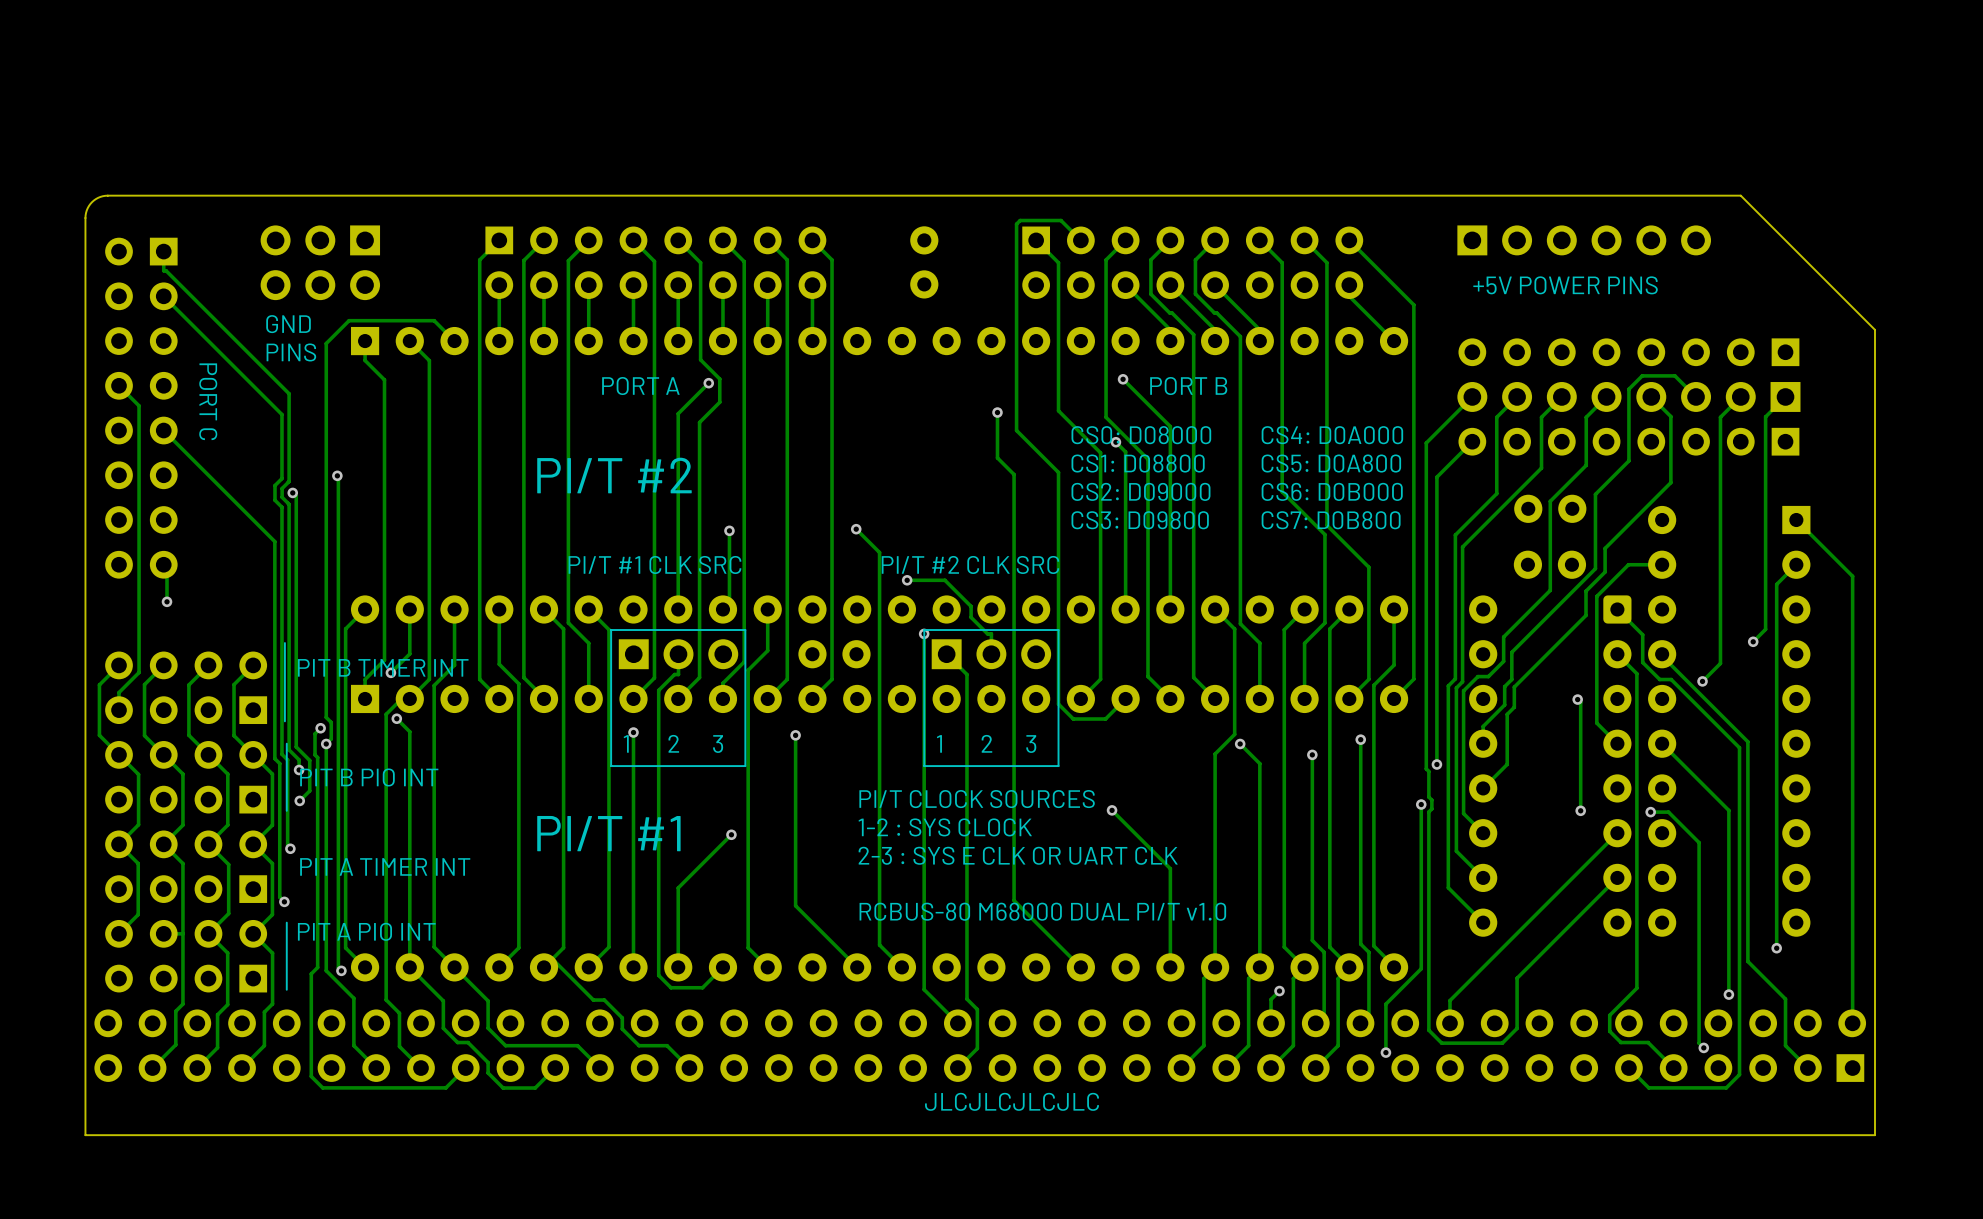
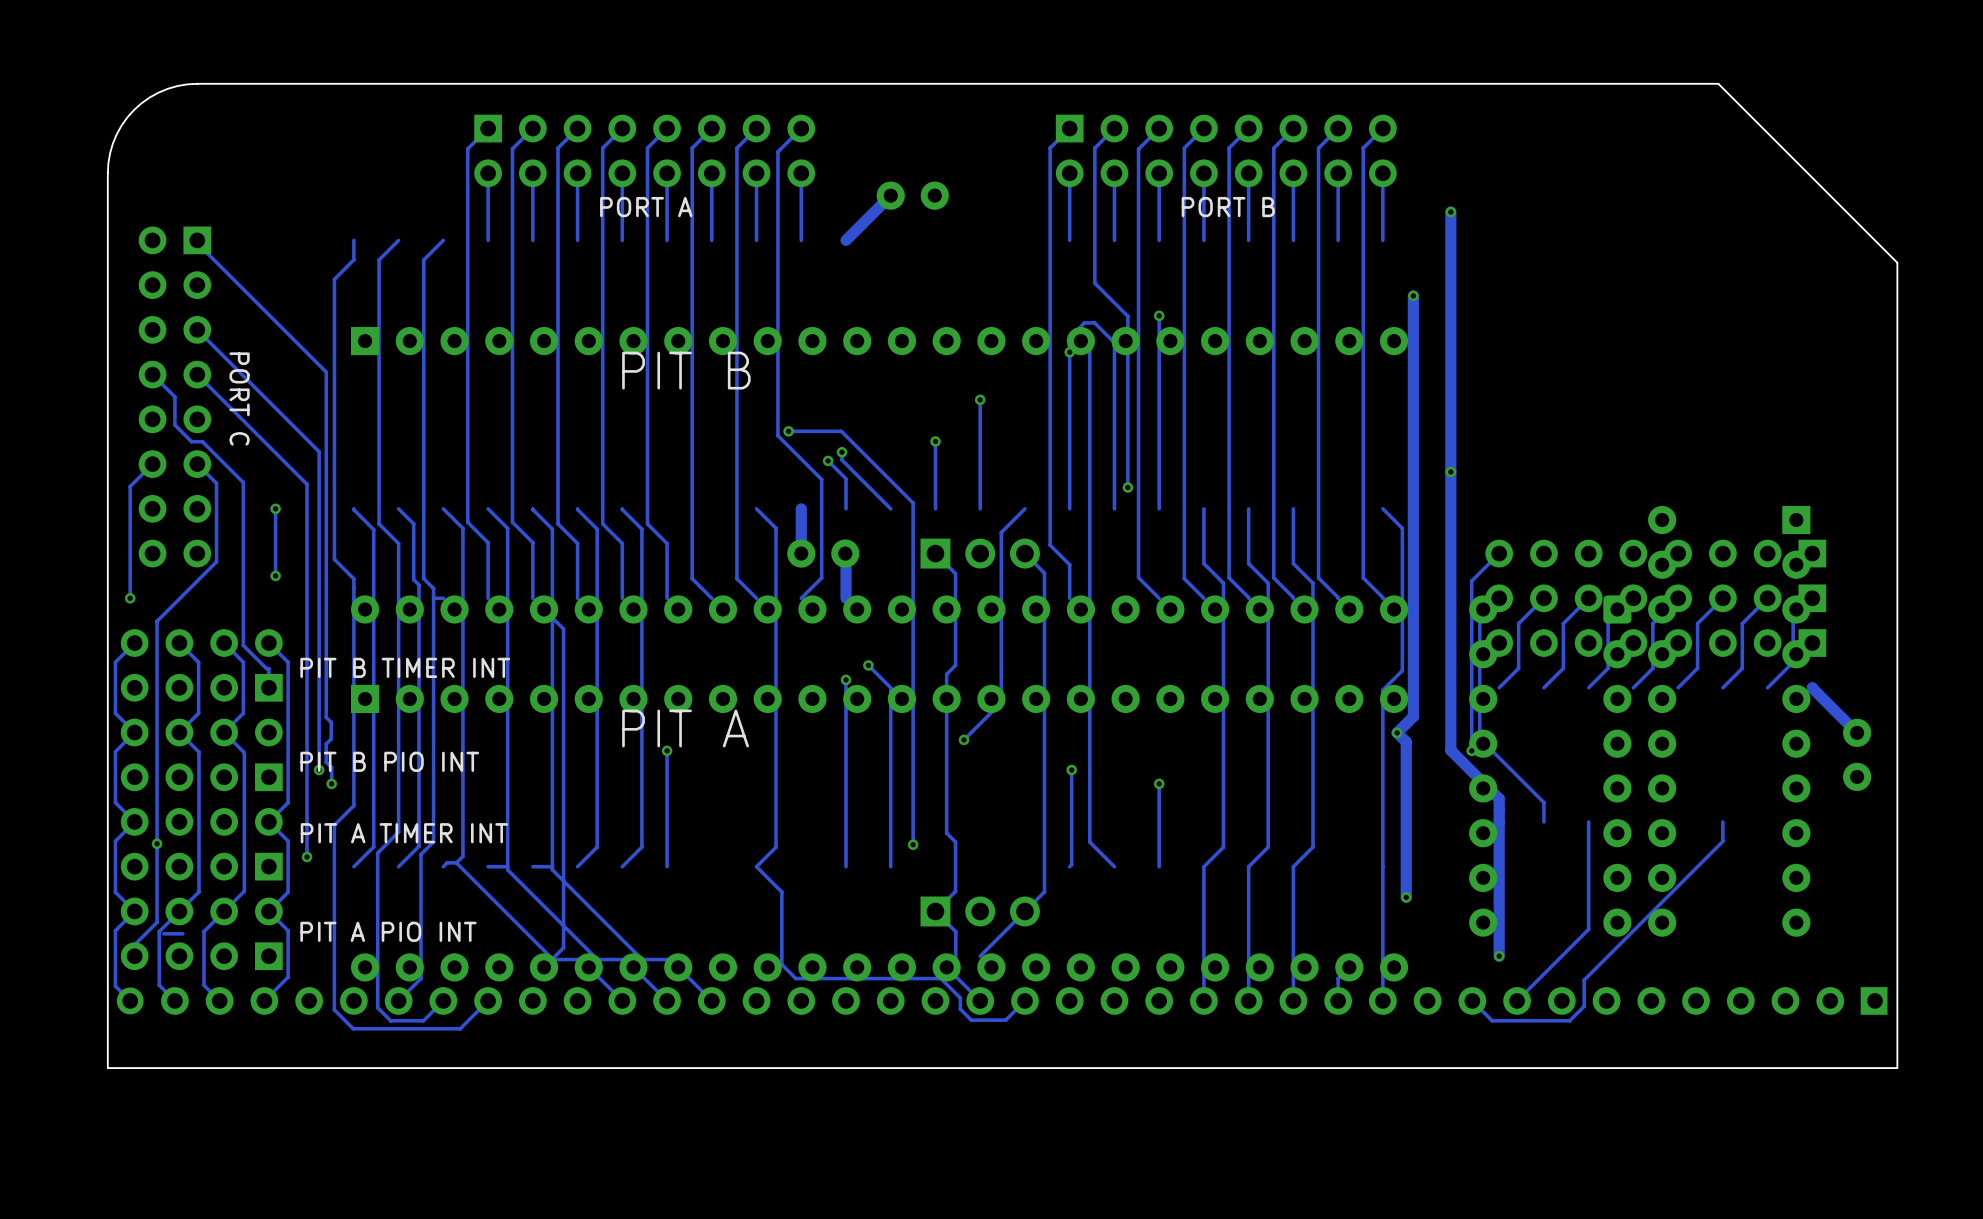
track: none -> (488, 128) (467, 148) (467, 522) (488, 542) (488, 598)
track: none -> (532, 128) (512, 148) (512, 522) (532, 542) (532, 598)
track: none -> (577, 128) (558, 148) (558, 523) (577, 543) (577, 598)
track: none -> (622, 128) (602, 148) (602, 523) (622, 543) (622, 598)
track: none -> (667, 128) (647, 148) (647, 523) (667, 543) (667, 598)
track: none -> (711, 128) (692, 148) (692, 578) (711, 598)
track: none -> (756, 128) (736, 148) (736, 578) (756, 598)
track: none -> (801, 128) (777, 151) (777, 435) (821, 479) (821, 577) (801, 598)
track: none -> (1069, 128) (1050, 148) (1050, 545) (1069, 564) (1069, 598)
track: none -> (1114, 128) (1094, 148) (1094, 283) (1127, 316) (1127, 487)
track: none -> (1159, 128) (1138, 149) (1138, 577) (1159, 598)
track: none -> (1203, 128) (1184, 148) (1184, 578) (1203, 598)
track: none -> (1248, 128) (1229, 148) (1229, 577) (1248, 598)
track: none -> (1293, 128) (1273, 148) (1273, 577) (1293, 598)
track: none -> (1338, 128) (1318, 148) (1318, 577) (1338, 598)
track: none -> (1382, 128) (1363, 148) (1363, 577) (1382, 598)
track: none -> (488, 173) (488, 240)
track: none -> (532, 173) (532, 240)
track: none -> (577, 173) (577, 240)
track: none -> (622, 173) (622, 240)
track: none -> (667, 173) (667, 240)
track: none -> (711, 173) (711, 240)
track: none -> (756, 173) (756, 240)
track: none -> (801, 173) (801, 240)
track: none -> (1069, 173) (1069, 240)
track: none -> (1114, 173) (1114, 240)
track: none -> (1159, 173) (1159, 240)
track: none -> (1203, 173) (1203, 240)
track: none -> (1248, 173) (1248, 240)
track: none -> (1293, 173) (1293, 240)
track: none -> (1338, 173) (1338, 240)
track: none -> (1382, 173) (1382, 240)
track: none -> (890, 195) (846, 240)
track: none -> (1450, 212) (1450, 750) (1499, 798) (1499, 956)
via: none -> (1450, 212)
track: none -> (353, 240) (353, 259) (334, 279) (334, 559) (353, 578) (353, 805) (334, 825) (334, 1009) (353, 1028) (460, 1028) (488, 1000)
track: none -> (398, 240) (379, 259) (379, 523) (398, 543) (398, 832) (377, 853) (377, 1007) (390, 1020) (423, 1020) (443, 1000)
track: none -> (443, 240) (423, 259) (423, 578) (433, 588) (433, 841) (420, 854) (420, 978) (398, 1000)
track: (499, 240) (479, 259) (479, 679) (499, 698) -> none
track: (544, 240) (523, 260) (523, 677) (544, 697) -> none
track: (588, 240) (568, 260) (568, 622) (588, 643) (588, 698) -> none
track: (633, 240) (654, 261) (654, 677) (633, 698) -> none
track: (678, 240) (700, 262) (700, 359) (719, 379) (719, 402) (699, 422) (699, 677) (678, 698) -> none
track: (722, 240) (744, 261) (744, 661) (722, 683) (722, 698) -> none
track: (767, 240) (787, 259) (787, 679) (767, 698) -> none
track: (812, 240) (832, 259) (832, 679) (812, 698) -> none
track: (1036, 240) (1058, 262) (1058, 410) (1100, 452) (1100, 679) (1080, 698) -> none
track: (1080, 240) (1061, 220) (1020, 220) (1016, 224) (1016, 430) (1058, 472) (1058, 704) (1073, 719) (1105, 719) (1125, 698) -> none
track: (1125, 240) (1106, 259) (1106, 417) (1147, 459) (1147, 676) (1170, 698) -> none
track: (1170, 240) (1150, 259) (1150, 294) (1193, 334) (1193, 677) (1215, 698) -> none
track: (1215, 240) (1195, 260) (1195, 293) (1240, 336) (1240, 623) (1259, 643) (1259, 698) -> none
track: (1259, 240) (1282, 262) (1282, 491) (1324, 534) (1324, 622) (1304, 643) (1304, 698) -> none
track: (1304, 240) (1326, 262) (1326, 525) (1368, 567) (1368, 679) (1349, 698) -> none
track: (1349, 240) (1413, 304) (1413, 679) (1394, 698) -> none
part: (1584, 240) -> none
track: (163, 251) (163, 270) (166, 270) (289, 393) (289, 481) (282, 488) (282, 497) (289, 504) (289, 749) (299, 759) (299, 769) -> none
part: (320, 262) -> none
part position: (655, 262) -> (644, 150)
part rotation: 0° (924, 262) -> 90° clockwise (912, 195)
part position: (924, 262) -> (912, 195)
part position: (1192, 262) -> (1226, 150)
track: (499, 285) (499, 341) -> none
track: (544, 285) (544, 341) -> none
track: (588, 285) (588, 341) -> none
track: (633, 285) (633, 341) -> none
track: (678, 285) (678, 341) -> none
track: (722, 285) (722, 341) -> none
track: (767, 285) (767, 341) -> none
track: (812, 285) (812, 341) -> none
track: (1125, 285) (1170, 329) -> none
track: (1170, 285) (1215, 329) -> none
track: (1215, 285) (1259, 329) -> none
text: +5V POWER PINS (1565, 285) -> none
track: none -> (1413, 295) (1413, 716) (1397, 732) (1406, 741) (1406, 897)
via: none -> (1413, 295)
track: (163, 296) (197, 329) -> none
track: (1349, 296) (1394, 341) -> none
track: none -> (1159, 315) (1159, 508)
via: none -> (1159, 315)
text: GND (288, 324) -> none
track: none -> (1073, 333) (1084, 322) (1094, 322) (1114, 342) (1114, 508)
track: none -> (1089, 333) (1089, 842) (1114, 866)
track: (365, 341) (365, 360) (384, 379) (384, 660) (365, 679) (365, 698) -> none
track: (409, 341) (429, 360) (429, 679) (409, 698) -> none
track: (454, 341) (434, 320) (349, 320) (326, 343) (326, 717) -> (197, 240) (197, 243) (326, 372) (326, 717)
text: PINS (291, 352) -> none
track: none -> (1069, 352) (1069, 508)
via: none -> (1069, 352)
part: (1628, 352) -> none
text: none -> PIT B (686, 370)
track: none -> (152, 374) (174, 396) (174, 425) (191, 441) (202, 441) (243, 482) (243, 645) (266, 668) (268, 668) (268, 687)
track: none -> (197, 374) (307, 484) (307, 856)
track: (1123, 379) (1170, 426) (1170, 609) -> none
via: (1123, 379) -> none
track: (708, 383) (678, 413) (678, 609) -> none
via: (708, 383) -> none
track: (119, 385) (139, 405) (139, 672) (119, 692) (119, 710) -> none
text position: PORT A (640, 386) -> PORT A (646, 207)
text position: PORT B (1188, 386) -> PORT B (1228, 207)
track: (1472, 396) (1426, 443) (1426, 768) (1428, 771) (1428, 797) (1431, 800) (1431, 808) (1428, 811) (1428, 1030) (1441, 1043) (1502, 1043) (1517, 1028) (1517, 978) (1617, 877) -> none
track: (1517, 396) (1496, 417) (1496, 493) (1455, 535) (1455, 678) (1448, 685) (1448, 887) (1483, 922) -> none
track: (1561, 396) (1541, 417) (1541, 468) (1462, 547) (1462, 681) (1456, 688) (1456, 851) (1483, 877) -> none
track: (1606, 396) (1586, 417) (1586, 465) (1550, 501) (1550, 590) (1503, 637) (1503, 661) (1488, 676) (1477, 676) (1463, 690) (1463, 813) (1483, 833) -> none
part: (1628, 396) -> none
track: (1651, 396) (1670, 416) (1670, 482) (1605, 548) (1605, 572) (1586, 591) (1586, 615) (1514, 687) (1514, 707) (1507, 714) (1507, 764) (1483, 788) -> none
track: (1696, 396) (1674, 375) (1642, 375) (1628, 389) (1628, 460) (1595, 494) (1595, 568) (1511, 652) (1511, 679) (1504, 686) (1504, 704) (1483, 726) (1483, 743) -> none
track: (1740, 396) (1720, 417) (1720, 663) (1702, 681) -> none
track: (1785, 396) (1765, 416) (1765, 629) (1753, 641) -> none
track: none -> (980, 399) (980, 508)
text position: PORT C (208, 401) -> PORT C (239, 398)
part position: (141, 408) -> (174, 396)
track: (997, 412) (997, 457) (1014, 474) (1014, 900) (1080, 967) -> none
via position: (997, 412) -> (980, 399)
track: (281, 414) (281, 478) (274, 485) (274, 500) (281, 507) (281, 754) (287, 760) (287, 846) (290, 848) -> (281, 414) (319, 451) (319, 770)
track: (163, 430) (197, 464) -> none
track: none -> (788, 431) (841, 431) (913, 503) (913, 844)
via: none -> (788, 431)
text: CS0: D08000 (1141, 435) -> none
text: CS4: D0A000 (1332, 435) -> none
track: none -> (935, 441) (935, 508)
via: none -> (935, 441)
track: (1472, 441) (1436, 477) (1436, 764) -> none
part: (1628, 441) -> none
track: (1115, 442) (1125, 451) (1125, 609) -> none
via position: (1115, 442) -> (1127, 487)
track: none -> (841, 452) (841, 460) (890, 508)
via: none -> (841, 452)
track: none -> (828, 460) (846, 478) (846, 508)
via: none -> (828, 460)
text: CS1: D08800 (1138, 463) -> none
text: CS5: D0A800 (1331, 463) -> none
track: none -> (152, 464) (130, 486) (130, 598)
via: none -> (1450, 471)
via: (337, 475) -> none
track: (338, 475) (338, 967) (341, 970) -> none
text: PI/T #2 (614, 475) -> none
track: (216, 483) (274, 541) (274, 758) (279, 763) (279, 897) (284, 901) -> (216, 483) (216, 561) (157, 621) (157, 922) (134, 944) (134, 956)
text: CS2: D09000 (1140, 491) -> none
text: CS6: D0B000 (1332, 491) -> none
track: (292, 492) (296, 496) (296, 746) (309, 760) (309, 790) (299, 800) -> none
via position: (292, 492) -> (275, 508)
track: none -> (275, 508) (275, 575)
track: none -> (353, 508) (373, 529) (373, 846) (353, 866)
track: none -> (398, 508) (413, 523) (413, 579) (418, 584) (418, 846) (398, 866)
track: none -> (443, 508) (462, 528) (462, 856) (456, 862)
track: none -> (488, 508) (507, 528) (507, 869) (597, 959) (625, 959) (667, 1000)
track: none -> (532, 508) (552, 529) (552, 869) (642, 959) (670, 959) (711, 1000)
track: none -> (577, 508) (597, 529) (597, 847) (577, 866)
track: none -> (622, 508) (641, 529) (641, 847) (622, 866)
track: none -> (756, 508) (776, 528) (776, 847) (756, 866) (781, 892) (781, 964) (795, 978) (940, 978) (960, 998) (960, 1009) (971, 1020) (1005, 1020) (1024, 1000)
track: none -> (801, 508) (801, 553)
track: none -> (1024, 508) (1001, 532) (1001, 702) (963, 739)
track: none -> (1382, 508) (1402, 528) (1402, 670) (1382, 690) (1382, 1000)
part: (1550, 508) -> none
text: CS3: D09800 (1140, 520) -> none
text: CS7: D0B800 (1331, 520) -> none
track: (1796, 520) (1852, 576) (1852, 1023) -> none
track: (856, 529) (879, 552) (879, 945) (901, 967) -> none
via: (856, 529) -> none
track: (729, 530) (729, 603) -> none
via: (729, 530) -> none
track: none -> (845, 553) (846, 598)
track: none -> (935, 553) (955, 573) (955, 665) (946, 674) (946, 833) (955, 842) (955, 891) (935, 911) (955, 931) (955, 976) (980, 1000)
track: none -> (1024, 553) (1044, 573) (1044, 891) (980, 956)
track: none -> (1499, 553) (1471, 581) (1471, 750)
part: none -> (1655, 553)
text: PI/T #1 CLK SRC (654, 564) -> none
text: PI/T #2 CLK SRC (970, 564) -> none
part: (1549, 564) -> none
track: (1662, 564) (1628, 564) (1596, 596) (1596, 723) (1617, 743) -> none
track: (1796, 564) (1776, 584) (1776, 948) -> none
track: (167, 568) (167, 601) -> none
via: none -> (275, 575)
part: none -> (1002, 575)
track: (907, 580) (944, 580) (971, 606) (971, 617) (987, 633) (991, 633) (991, 654) -> none
via: (907, 580) -> none
track: none -> (443, 598) (433, 598)
track: none -> (1499, 598) (1479, 617) (1479, 738) (1543, 802) (1543, 821)
track: none -> (1543, 598) (1518, 623) (1518, 668) (1499, 687)
track: none -> (1588, 598) (1563, 623) (1563, 668) (1543, 687)
track: none -> (1633, 598) (1608, 623) (1608, 668) (1588, 687)
part: none -> (1655, 598)
track: none -> (1678, 598) (1652, 623) (1652, 668) (1633, 687)
track: none -> (1722, 598) (1697, 623) (1697, 668) (1678, 687)
track: none -> (1767, 598) (1742, 623) (1742, 668) (1722, 687)
track: none -> (1812, 598) (1793, 617) (1793, 662) (1767, 687)
via position: (167, 601) -> (130, 598)
track: (365, 609) (345, 628) (345, 947) (365, 967) -> none
track: (409, 609) (409, 653) (390, 672) -> none
track: (454, 609) (454, 665) (434, 685) (434, 947) (488, 1000) (488, 1028) (505, 1045) (577, 1045) (599, 1068) -> none
track: (499, 609) (499, 664) (518, 683) (518, 947) (499, 967) -> none
track: (588, 609) (608, 629) (608, 947) (588, 967) -> none
track: (767, 609) (767, 650) (748, 670) (748, 947) (767, 967) -> none
track: (1215, 609) (1234, 629) (1234, 734) (1215, 754) (1215, 967) (1203, 978) -> (1203, 508) (1203, 563) (1223, 583) (1223, 847) (1203, 866) (1203, 978)
track: (1304, 609) (1284, 629) (1284, 947) (1304, 967) (1293, 978) -> (1293, 508) (1293, 563) (1312, 583) (1312, 847) (1293, 866) (1293, 978)
track: (1349, 609) (1329, 628) (1329, 947) (1349, 966) -> none
track: (1394, 609) (1394, 665) (1373, 685) (1373, 946) (1394, 966) -> none
track: (1617, 609) (1642, 634) (1642, 662) (1659, 679) (1671, 679) (1739, 747) (1739, 1074) (1726, 1087) (1648, 1087) (1628, 1068) -> none
line: (745, 630) (611, 630) (611, 766) (745, 766) (745, 630) -> none
line: (1058, 630) (924, 630) (924, 766) (1058, 766) (1058, 630) -> none
track: (924, 633) (924, 989) (957, 1023) -> none
via: (924, 633) -> none
via: (1753, 641) -> none
track: none -> (134, 643) (115, 662) (115, 713) (134, 732) (115, 751) (115, 802) (134, 821) (115, 841) (115, 892) (134, 911) (115, 930) (115, 986) (130, 1000)
track: none -> (179, 643) (198, 662) (198, 713) (179, 732) (198, 752) (198, 891) (159, 931) (159, 985) (174, 1000)
track: none -> (224, 643) (243, 662) (243, 713) (224, 732) (244, 752) (244, 891) (204, 931) (204, 985) (219, 1000)
track: none -> (268, 643) (288, 662) (288, 802) (268, 821) (288, 841) (288, 892) (268, 911) (288, 930) (288, 977) (264, 1000)
line: (284, 643) (284, 721) -> none
part: none -> (1655, 643)
track: (678, 654) (678, 674) (674, 674) (658, 690) (658, 975) (671, 987) (702, 987) (722, 967) -> none
part: (678, 654) -> none
part position: (834, 654) -> (823, 553)
track: (946, 654) (966, 674) (966, 999) (977, 1009) (977, 1048) (957, 1068) -> none
part position: (991, 654) -> (980, 553)
track: (1617, 654) (1636, 673) (1636, 988) (1609, 1015) (1609, 1031) (1620, 1042) (1648, 1042) (1673, 1068) -> none
track: (1662, 656) (1747, 741) (1747, 961) (1785, 999) (1785, 1045) (1807, 1068) -> none
track: (119, 665) (99, 684) (99, 735) (138, 774) (138, 824) (119, 844) (138, 863) (138, 914) (119, 933) -> none
track: (163, 665) (144, 684) (144, 735) (182, 774) (182, 825) (163, 844) (182, 863) (182, 1004) (175, 1011) (175, 1044) (152, 1068) -> none
track: (208, 665) (188, 684) (188, 735) (227, 774) (227, 825) (208, 844) (228, 864) (228, 913) (208, 933) (227, 953) (227, 1004) (217, 1014) (217, 1047) (197, 1068) -> none
track: (253, 665) (234, 684) (234, 735) (272, 774) (272, 825) (253, 844) (272, 863) (272, 914) (253, 933) (272, 953) (272, 1003) (264, 1012) (264, 1045) (242, 1068) -> none
track: none -> (868, 665) (890, 687) (890, 866)
via: none -> (868, 665)
part: (980, 665) -> none
via: (390, 672) -> none
track: none -> (846, 679) (846, 866)
via: none -> (846, 679)
via: (1702, 681) -> none
part position: (186, 687) -> (201, 665)
track: none -> (1812, 688) (1857, 732)
track: (401, 698) (386, 714) (386, 999) (399, 1013) (399, 1046) (420, 1068) -> none
track: (1577, 699) (1580, 702) (1580, 810) -> none
via: (1577, 699) -> none
track: (396, 718) (409, 731) (409, 967) (443, 1000) (443, 1028) (457, 1042) (468, 1042) (488, 1062) (488, 1072) (503, 1088) (535, 1088) (555, 1068) -> none
via: (396, 718) -> none
track: (320, 728) (315, 733) (315, 754) (317, 757) (317, 967) (311, 973) (311, 1076) (322, 1087) (445, 1087) (465, 1068) -> none
via: (320, 728) -> none
track: (633, 732) (633, 967) -> none
via position: (633, 732) -> (667, 750)
via: none -> (1397, 732)
track: (795, 735) (795, 905) (857, 967) -> none
via: (795, 735) -> none
via: none -> (963, 739)
track: (1360, 739) (1360, 944) (1368, 952) (1368, 1014) -> none
via: (1360, 739) -> none
line: (286, 743) (286, 810) -> none
track: (326, 743) (326, 970) (353, 998) (353, 1045) (376, 1068) -> (326, 743) (326, 762) (331, 767) (331, 783)
via: (326, 743) -> none
text: 1 (626, 743) -> PIT A (685, 728)
text: 2 (673, 743) -> none
text: 1 (939, 743) -> none
text: 2 (986, 743) -> none
track: (1240, 743) (1259, 763) (1259, 967) (1248, 978) -> (1248, 508) (1248, 563) (1268, 583) (1268, 847) (1248, 866) (1248, 978)
via: (1240, 743) -> none
track: (1662, 743) (1728, 810) (1728, 994) -> none
text: 3 (718, 744) -> none
text: 3 (1031, 744) -> none
track: none -> (667, 750) (667, 866)
via: none -> (1471, 750)
track: (1312, 754) (1312, 940) (1324, 952) (1324, 1014) -> none
via: (1312, 754) -> none
part: none -> (1857, 754)
via: (1436, 764) -> none
via: (299, 769) -> none
track: none -> (1071, 769) (1071, 864) (1069, 866)
via: none -> (1071, 769)
via: none -> (319, 770)
part position: (186, 777) -> (201, 754)
text position: PIT B PIO INT (369, 777) -> PIT B PIO INT (389, 761)
via: none -> (331, 783)
track: none -> (1159, 783) (1159, 866)
via: none -> (1159, 783)
text: PI/T CLOCK SOURCES (977, 799) -> none
via: (299, 800) -> none
track: (1421, 804) (1421, 968) (1385, 1004) (1385, 1052) -> none
via: (1421, 804) -> none
track: (1112, 810) (1170, 868) (1170, 967) -> none
via: (1112, 810) -> none
via: (1580, 810) -> none
track: (1650, 812) (1668, 812) (1699, 842) (1699, 1043) (1703, 1047) -> none
via: (1650, 812) -> none
track: none -> (1588, 821) (1588, 929) (1517, 1000)
track: none -> (1722, 821) (1722, 841) (1584, 980) (1584, 1006) (1569, 1020) (1492, 1020) (1472, 1000)
text: 1-2 : SYS CLOCK (945, 827) -> none
text: PI/T #1 (608, 833) -> none
track: (1617, 833) (1449, 1000) (1449, 1023) -> none
track: (731, 834) (678, 887) (678, 967) -> none
via: (731, 834) -> none
via: none -> (157, 843)
via: none -> (913, 844)
via position: (290, 848) -> (307, 856)
text: 2-3 : SYS E CLK OR UART CLK (1018, 855) -> none
track: none -> (456, 862) (447, 862) (443, 866)
part position: (186, 866) -> (201, 844)
text position: PIT A TIMER INT (385, 866) -> PIT A TIMER INT (404, 833)
track: none -> (507, 866) (488, 866)
track: none -> (552, 866) (532, 866)
via: none -> (1406, 897)
via: (284, 901) -> none
part: none -> (980, 911)
text: RCBUS-80 M68000 DUAL PI/T v1.0 (1042, 911) -> none
line: (286, 922) (286, 989) -> none
via: (1776, 948) -> none
part position: (186, 956) -> (201, 933)
via: none -> (1499, 956)
track: (553, 959) (593, 1000) (604, 1000) (622, 1017) (622, 1029) (638, 1045) (667, 1045) (689, 1068) -> (553, 959) (580, 959) (622, 1000)
via: (341, 970) -> none
track: (1279, 991) (1271, 999) (1271, 1023) -> none
via: (1279, 991) -> none
via: (1728, 994) -> none
track: (1203, 1000) (1203, 1045) (1181, 1068) -> none
track: (1248, 1000) (1248, 1045) (1226, 1068) -> none
track: (1293, 1000) (1293, 1045) (1271, 1068) -> none
track: (1338, 1000) (1338, 1045) (1315, 1068) -> none
via: (1703, 1047) -> none
via: (1385, 1052) -> none
text: JLCJLCJLCJLC (1012, 1101) -> none

